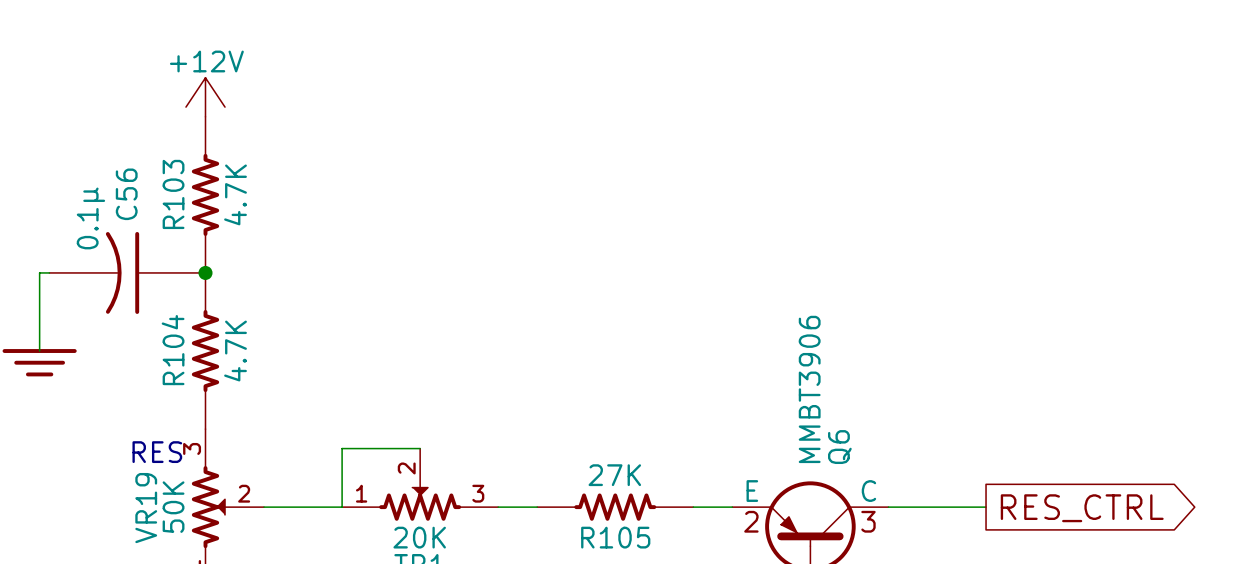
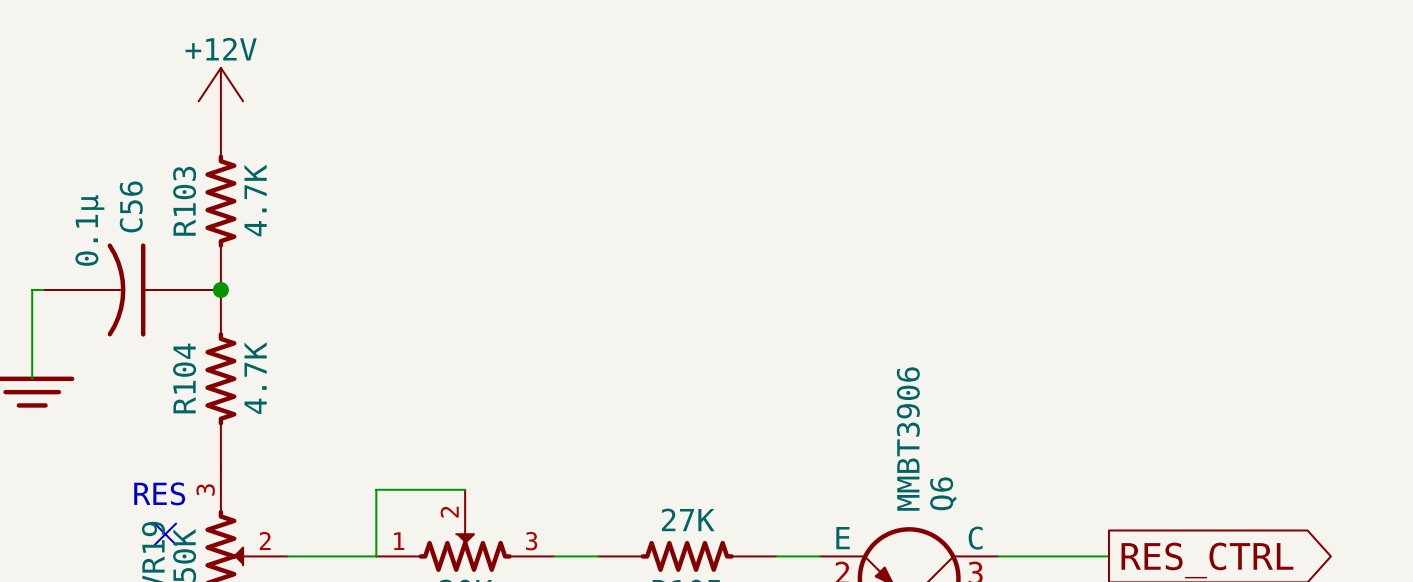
no-connect mark: none -> (165, 534)

